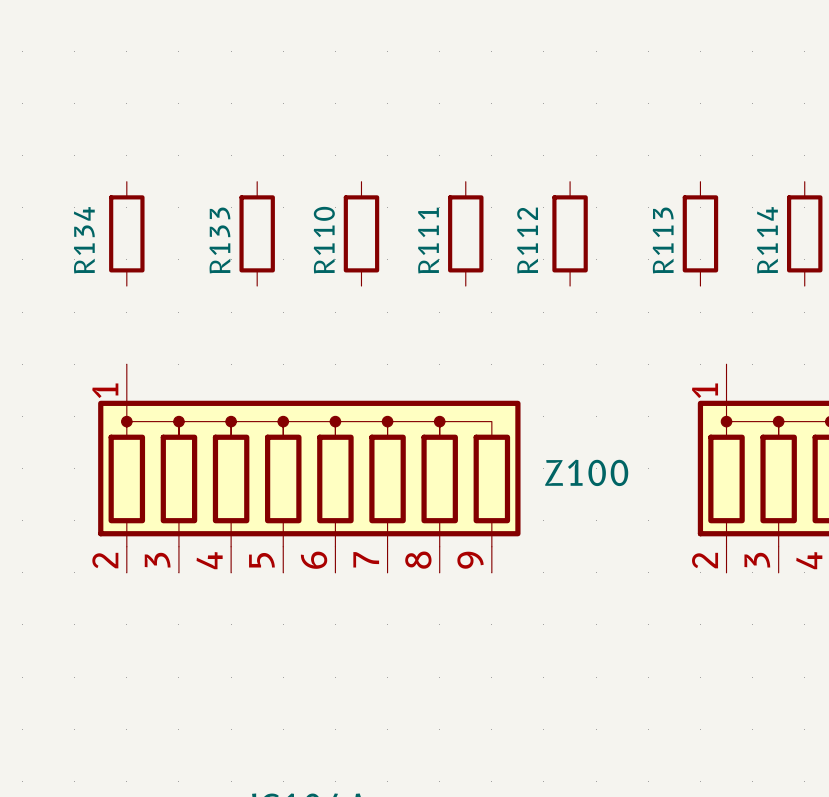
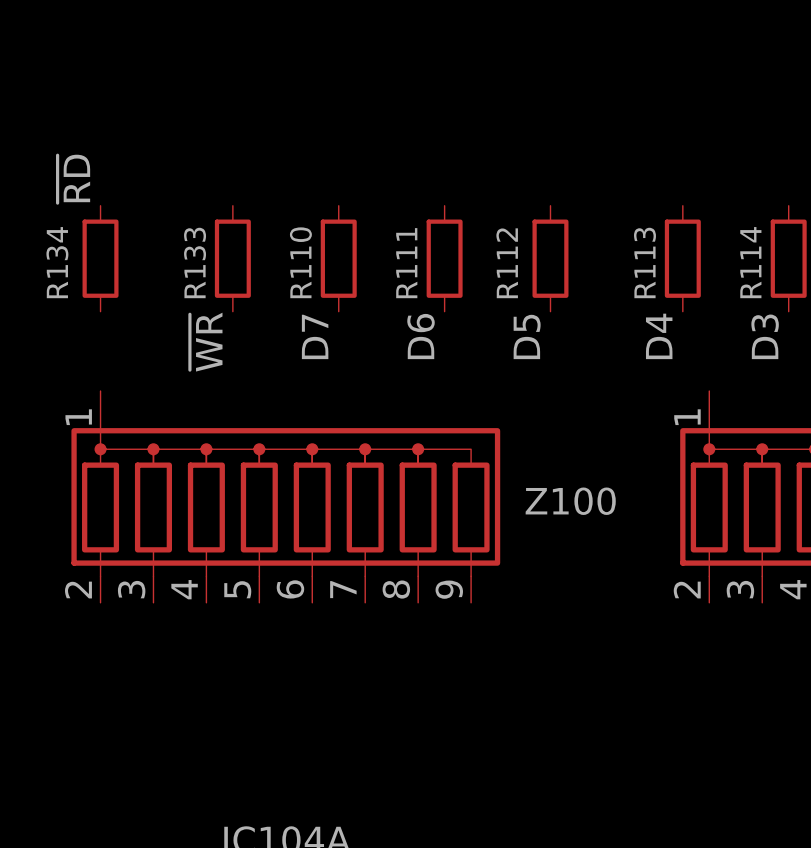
label: none -> ~{RD} (73, 178)
label: none -> D7 (315, 336)
label: none -> D6 (421, 336)
label: none -> D4 (659, 336)
label: none -> D3 (765, 336)
label: none -> D5 (527, 336)
label: none -> ~{WR} (206, 342)

